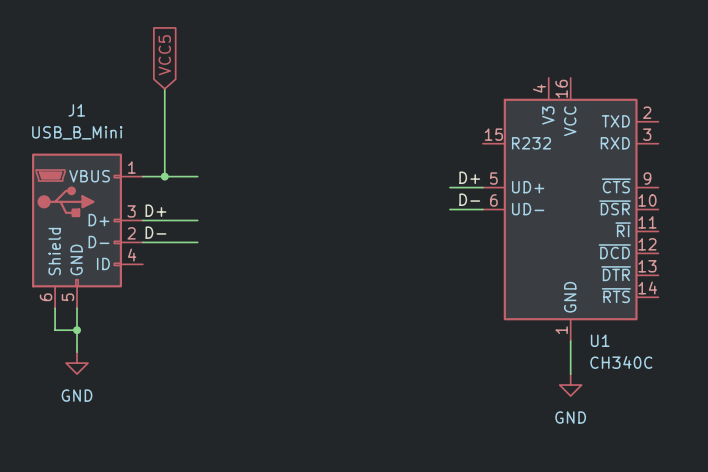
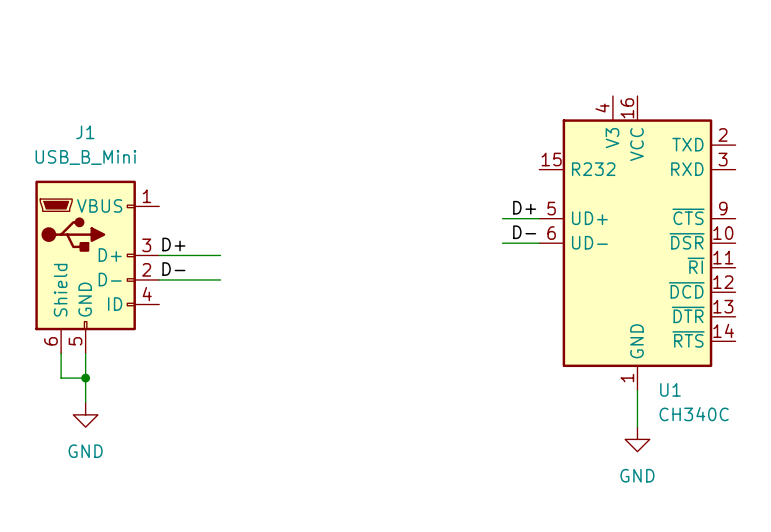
global label: VCC5 (164, 55) -> none
wire: (164, 88) (164, 176) -> none
wire: (142, 176) (197, 176) -> none
junction: (164, 176) -> none

